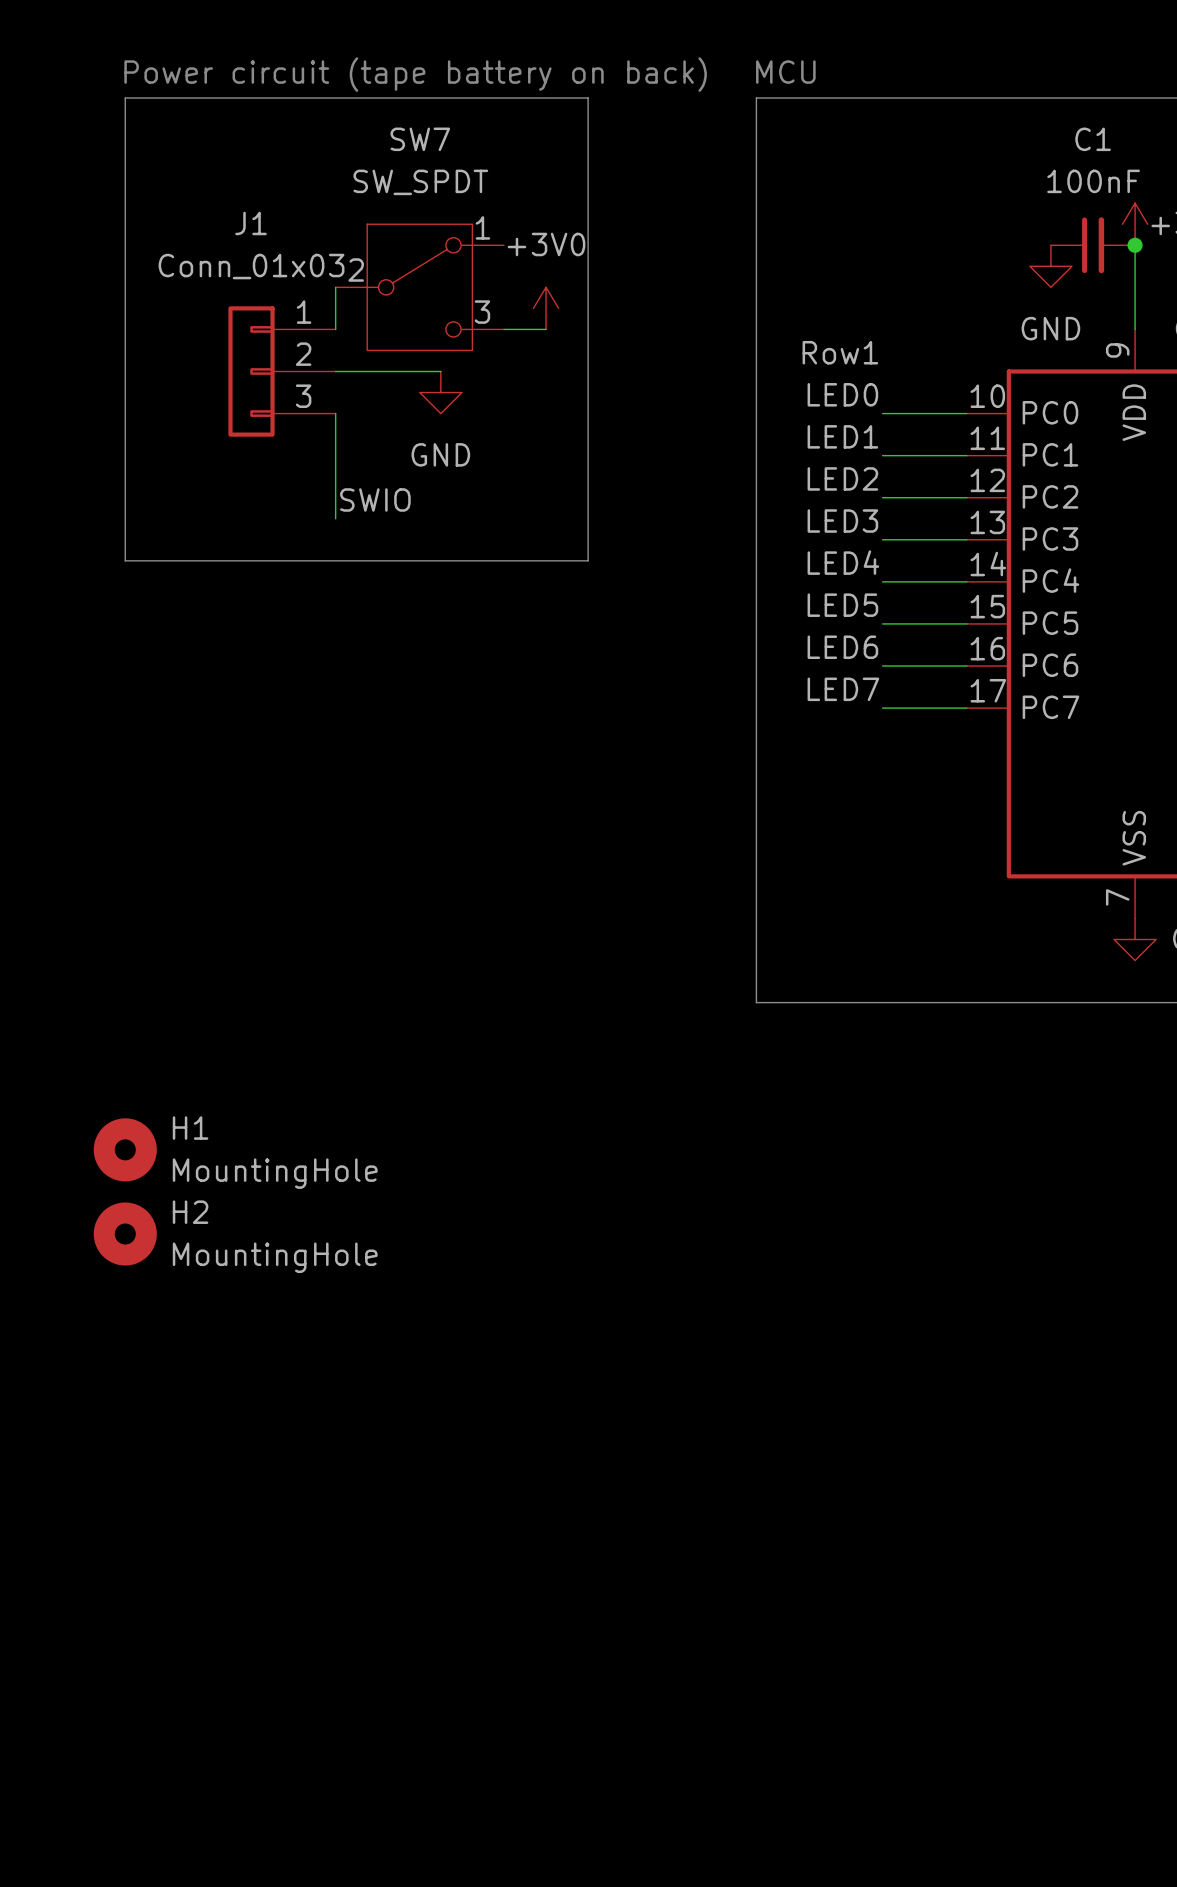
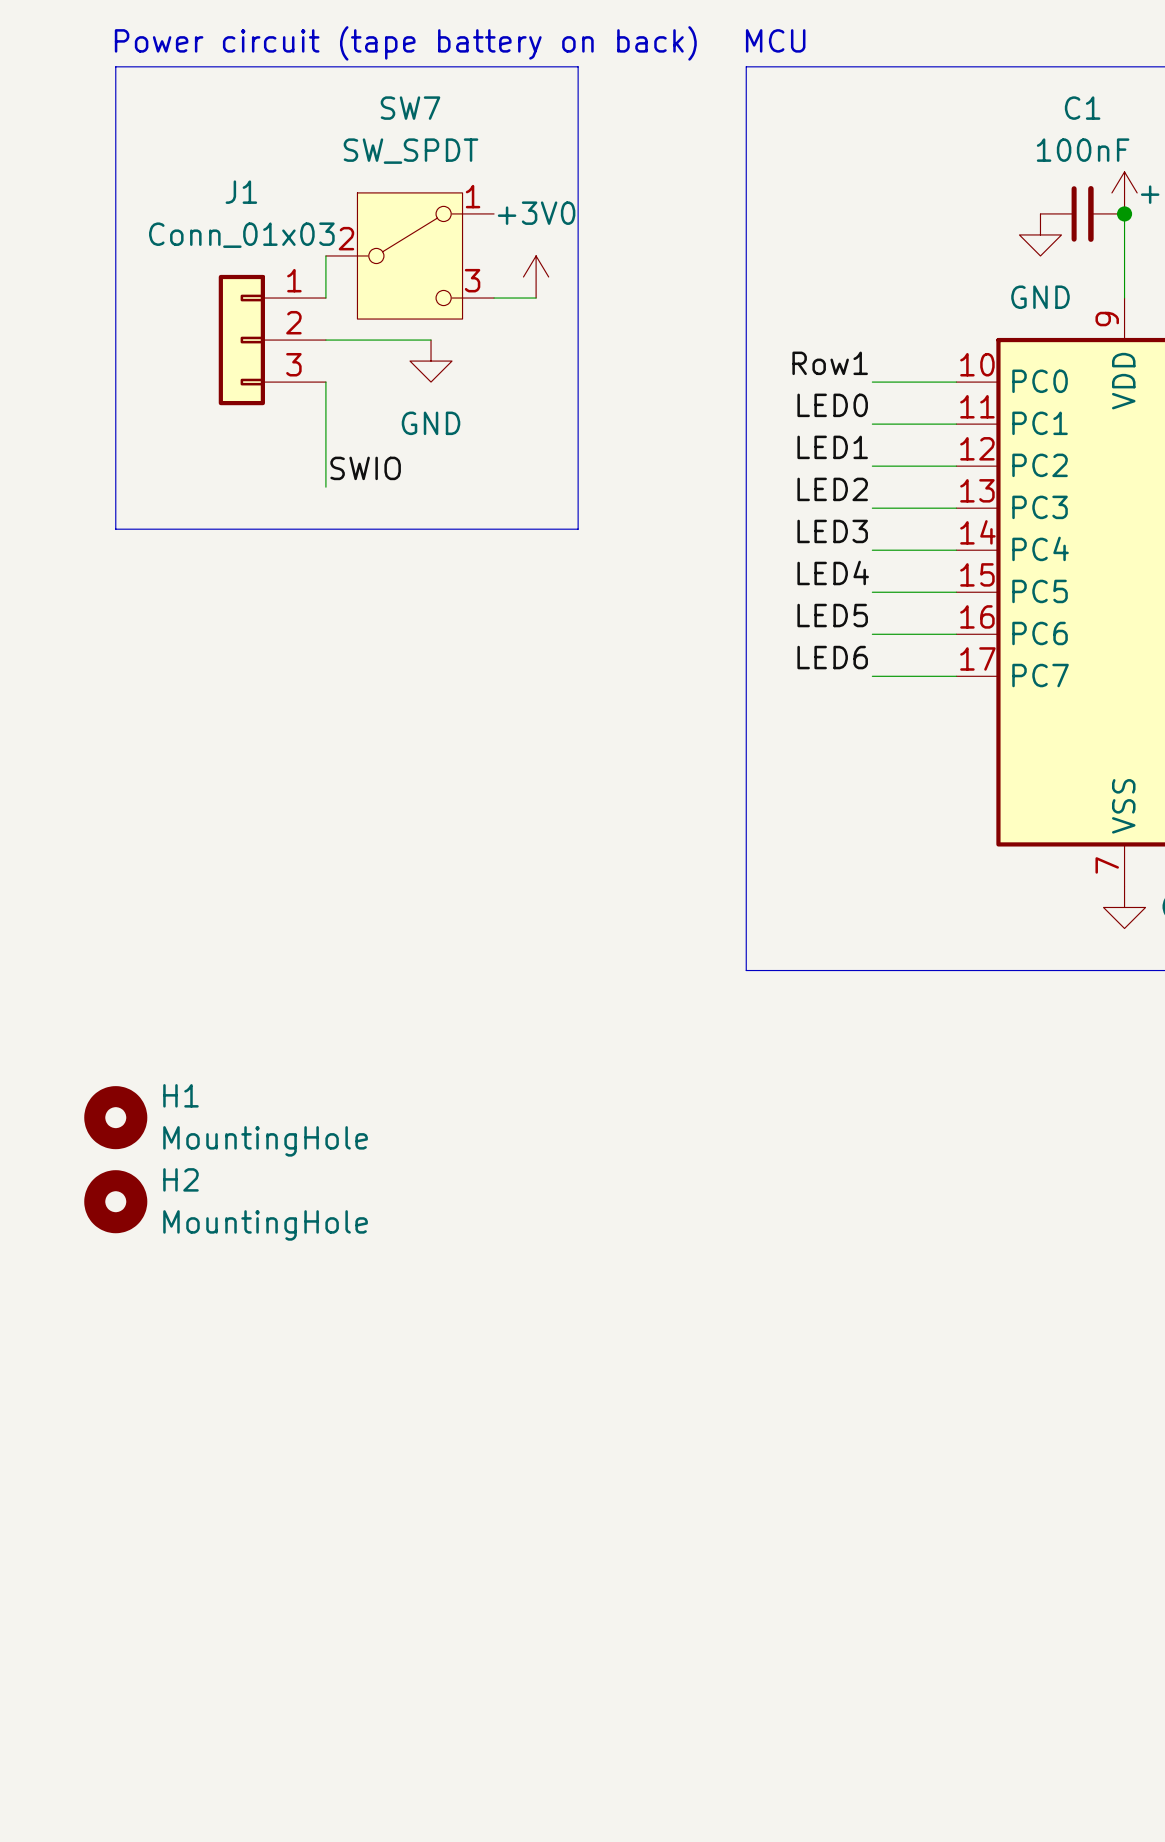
label: Row1 (840, 352) -> none
label: LED0 (842, 394) -> Row1 (830, 363)
label: LED1 (842, 436) -> LED0 (832, 405)
label: LED2 (842, 478) -> LED1 (832, 447)
label: LED3 (842, 521) -> LED2 (832, 489)
label: LED4 (843, 562) -> LED3 (832, 531)
label: LED5 (842, 605) -> LED4 (833, 572)
label: LED6 (842, 647) -> LED5 (832, 615)
label: LED7 (843, 689) -> LED6 (832, 657)

